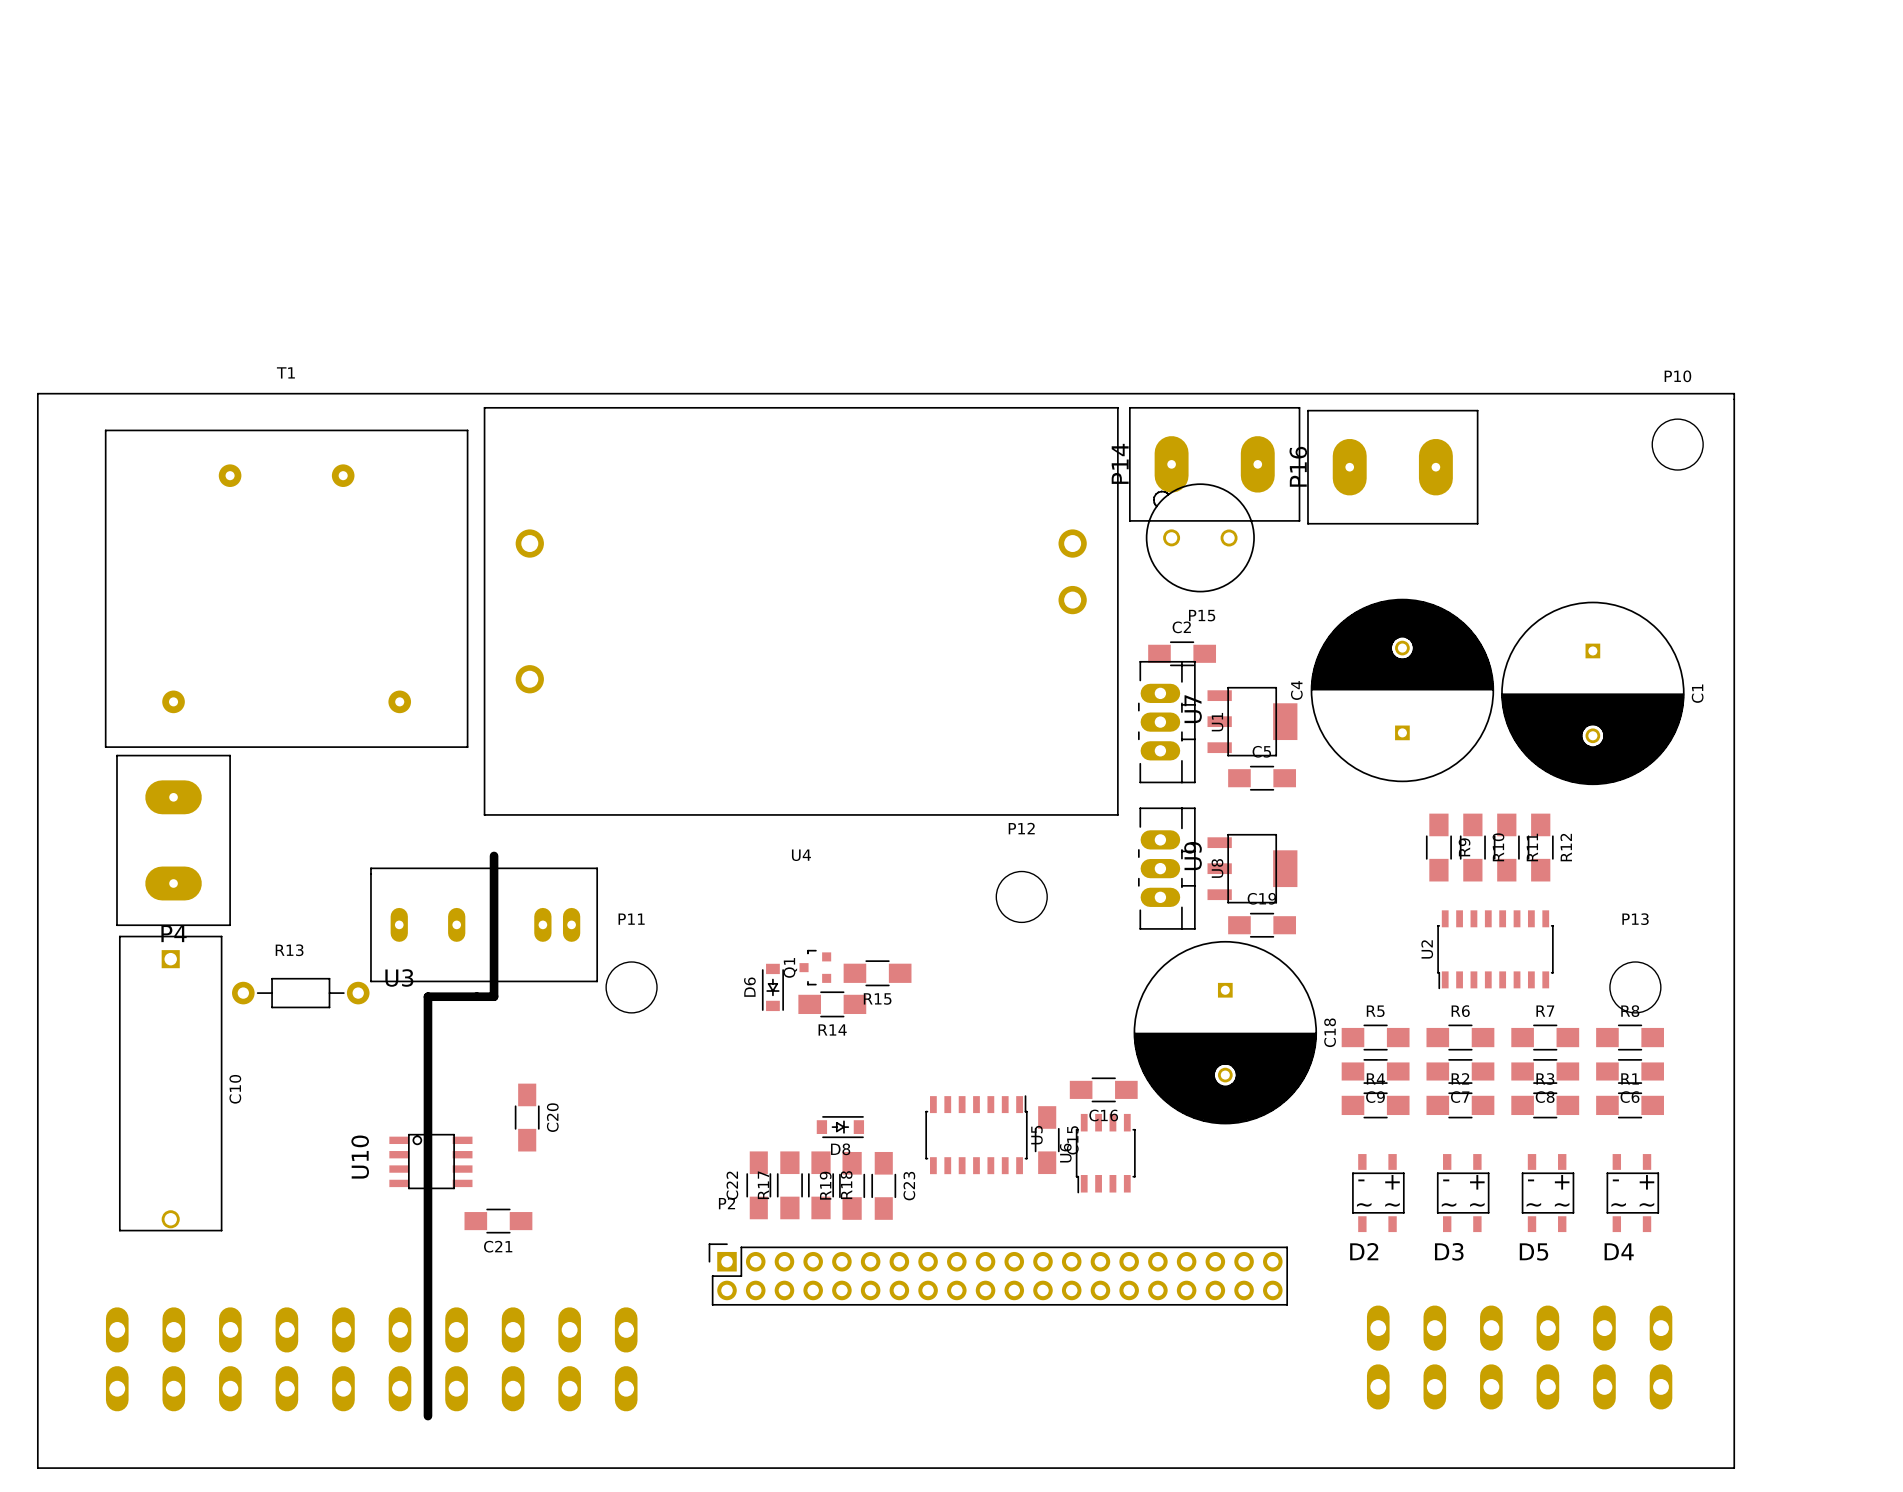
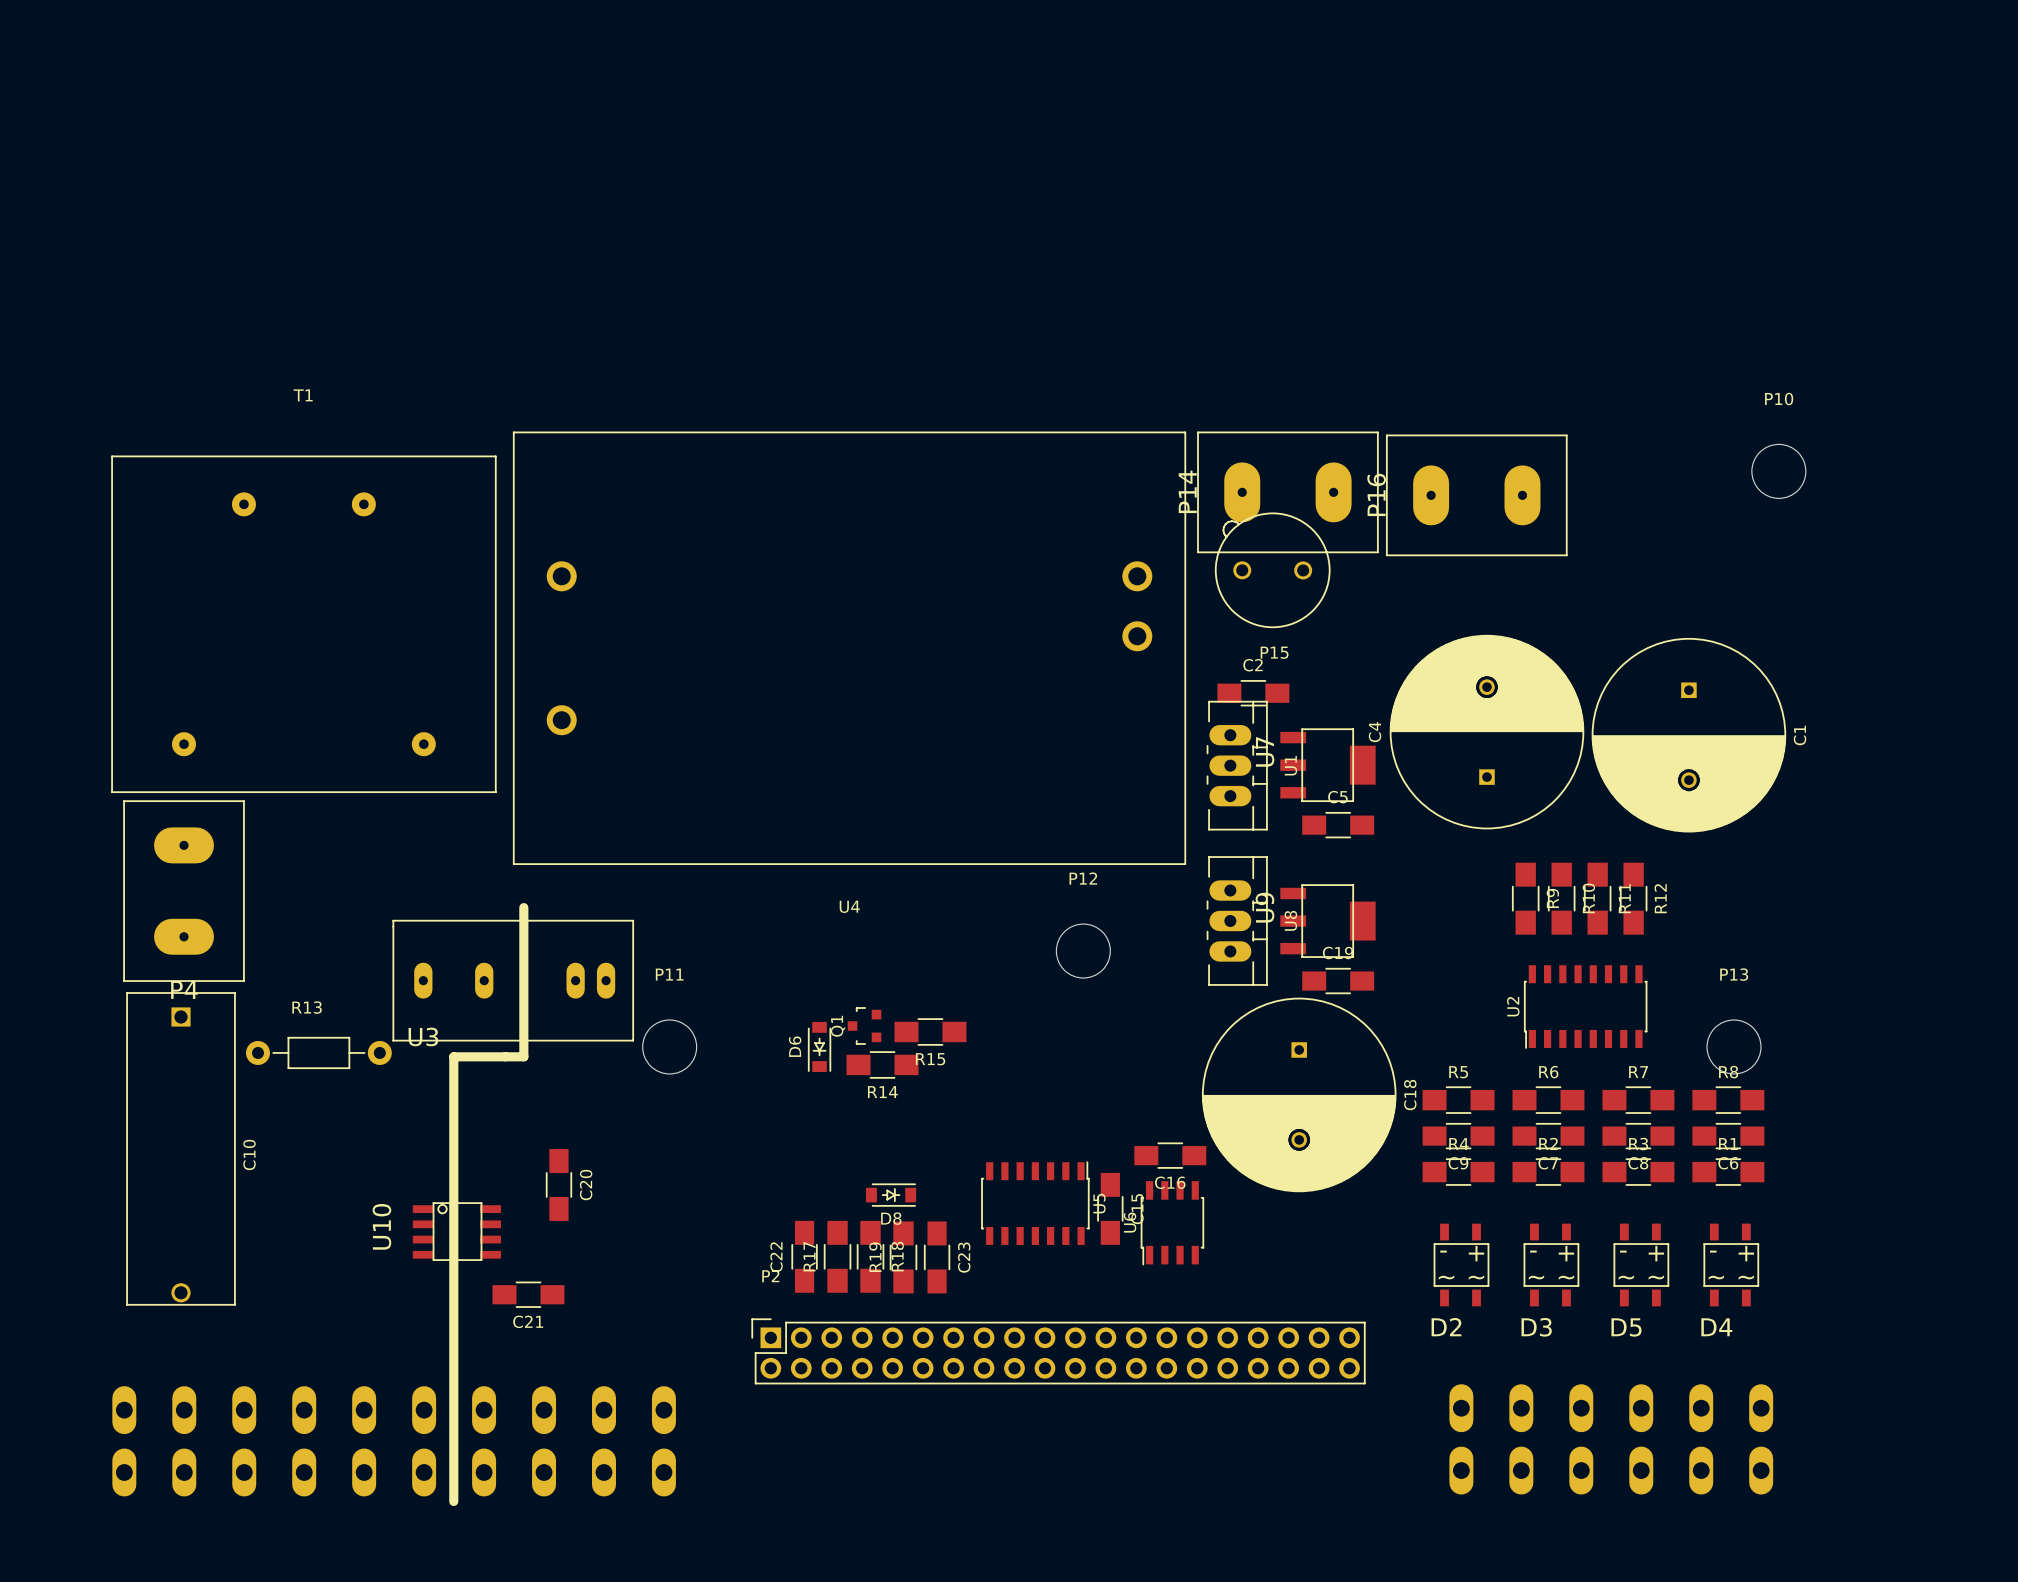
board edge: (37, 393) (1734, 393) (1734, 1468) (37, 1468) (37, 393) -> none

